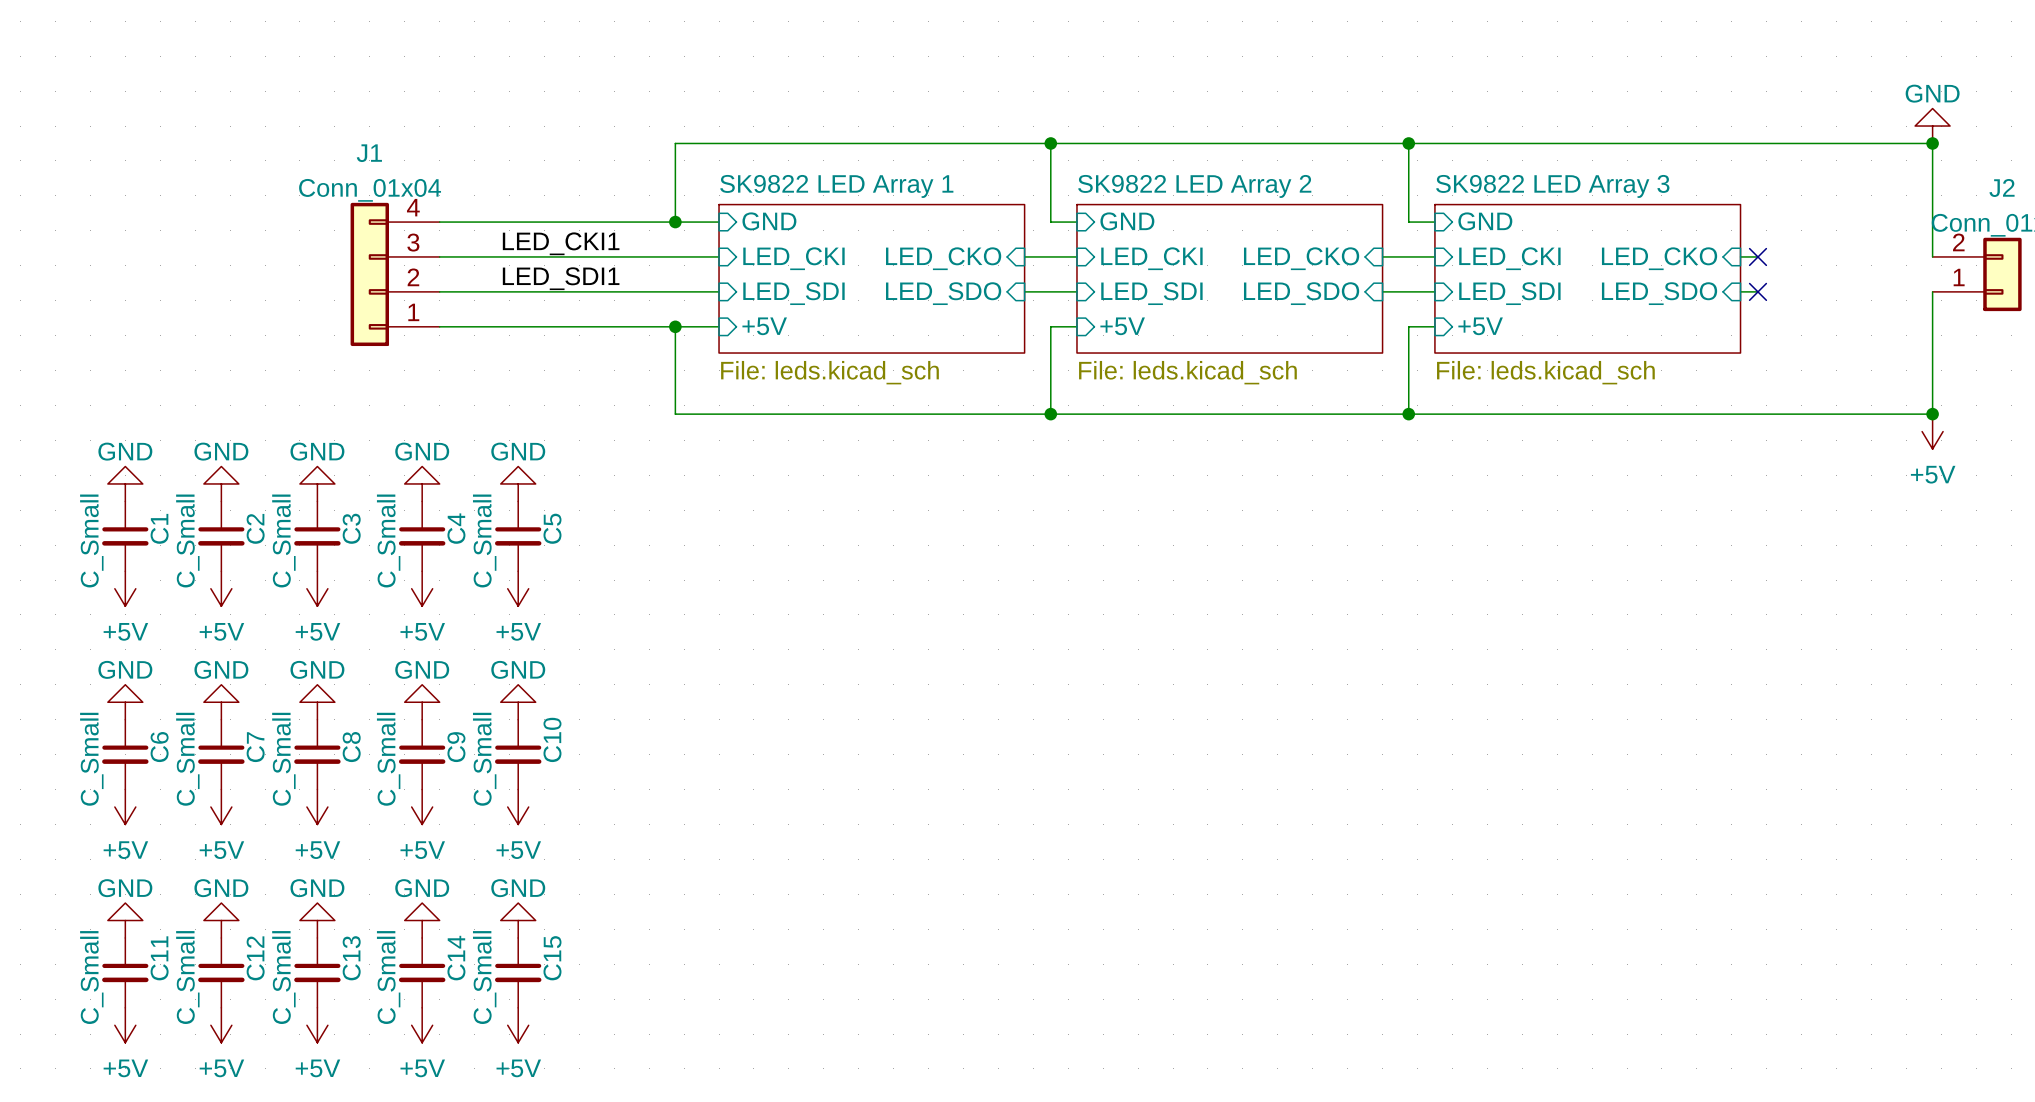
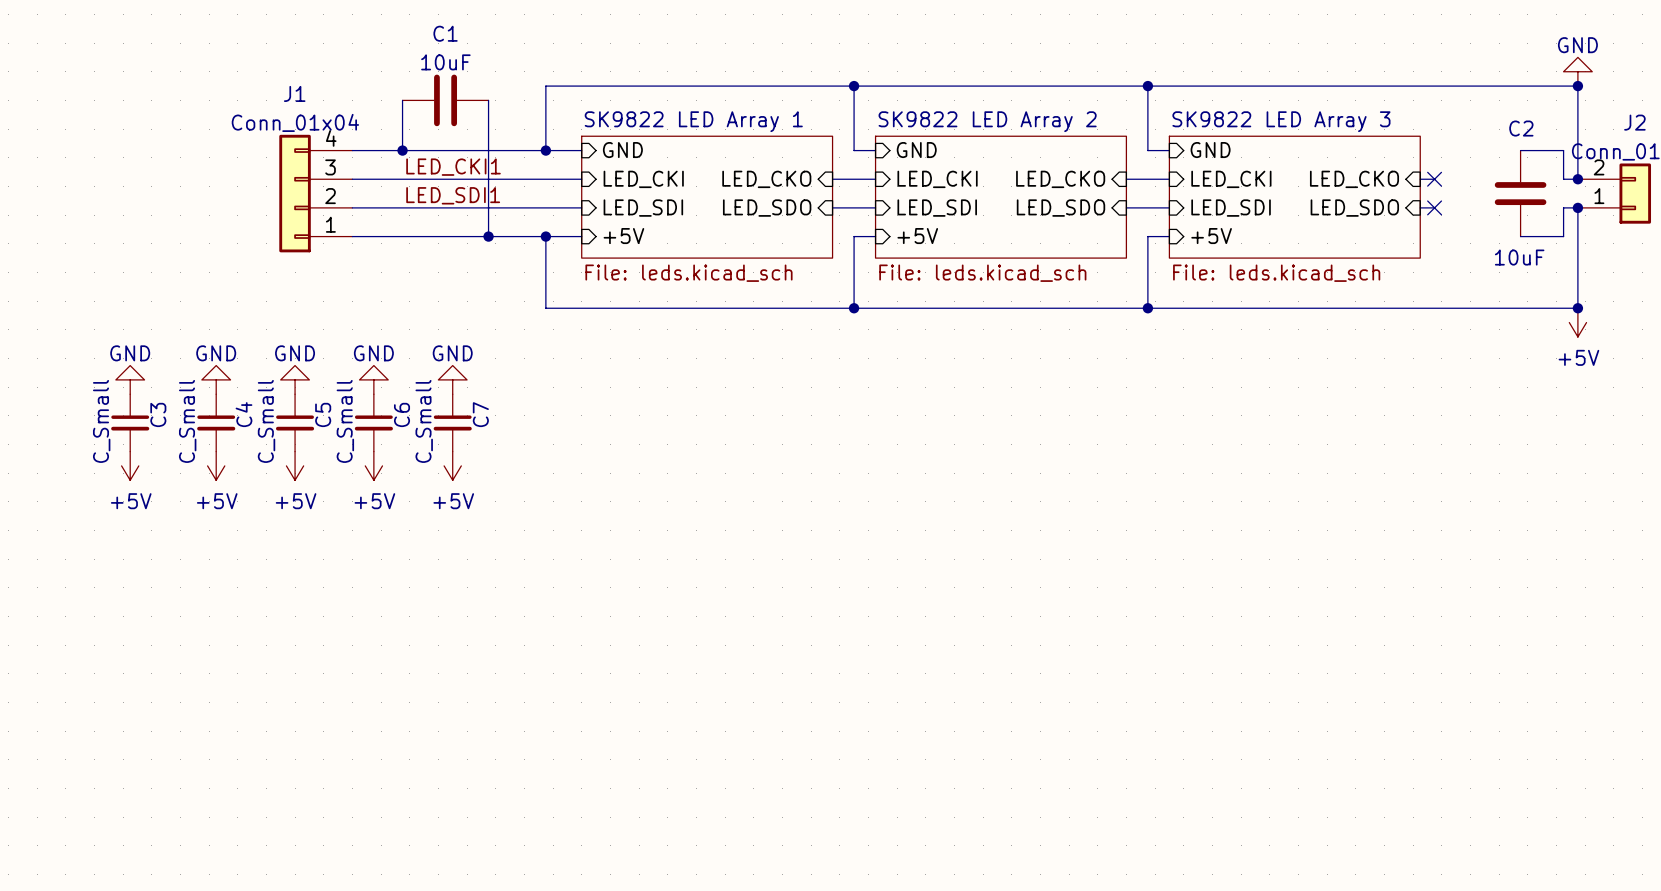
wire: none -> (402, 100) (402, 150)
wire: none -> (488, 100) (488, 236)
junction: none -> (402, 150)
wire: none -> (1520, 150) (1563, 150) (1563, 179) (1577, 179)
junction: none -> (1577, 179)
wire: none -> (1577, 207) (1563, 207) (1563, 236) (1520, 236)
junction: none -> (1577, 207)
junction: none -> (488, 236)
power symbol: GND (125, 483) -> none
power symbol: GND (221, 483) -> none
power symbol: GND (317, 483) -> none
power symbol: GND (422, 483) -> none
power symbol: GND (518, 483) -> none
C1 symbol: [102, 501, 149, 572] -> [402, 74, 489, 127]
power symbol: none -> GND (130, 379)
C2 symbol: [198, 501, 245, 572] -> [1494, 150, 1547, 237]
power symbol: none -> GND (216, 379)
power symbol: none -> GND (295, 379)
power symbol: none -> GND (373, 379)
power symbol: none -> GND (452, 379)
C1 name position: C1 (159, 528) -> C1 (445, 33)
C2 name position: C2 (255, 528) -> C2 (1521, 128)
C3 position: (317, 536) -> (130, 422)
C4 position: (422, 536) -> (216, 422)
C5 position: (518, 536) -> (295, 422)
C1 value: C_Small (91, 540) -> 10uF (445, 62)
C2 value: C_Small (187, 540) -> 10uF (1519, 257)
power symbol: +5V (125, 588) -> none
power symbol: +5V (221, 588) -> none
power symbol: +5V (317, 588) -> none
power symbol: +5V (422, 588) -> none
power symbol: +5V (518, 588) -> none
power symbol: none -> +5V (130, 465)
power symbol: none -> +5V (216, 465)
power symbol: none -> +5V (295, 465)
power symbol: none -> +5V (373, 465)
power symbol: none -> +5V (452, 465)
power symbol: GND (125, 702) -> none
power symbol: GND (221, 702) -> none
power symbol: GND (317, 702) -> none
power symbol: GND (422, 702) -> none
power symbol: GND (518, 702) -> none
C6 position: (125, 754) -> (373, 422)
C7 position: (221, 754) -> (452, 422)
C8: C_Small (317, 754) -> none
C9: C_Small (422, 754) -> none
C10: C_Small (518, 754) -> none
power symbol: +5V (125, 807) -> none
power symbol: +5V (221, 807) -> none
power symbol: +5V (317, 807) -> none
power symbol: +5V (422, 807) -> none
power symbol: +5V (518, 807) -> none
power symbol: GND (125, 920) -> none
power symbol: GND (221, 920) -> none
power symbol: GND (317, 920) -> none
power symbol: GND (422, 920) -> none
power symbol: GND (518, 920) -> none
C11: C_Small (125, 972) -> none
C12: C_Small (221, 972) -> none
C13: C_Small (317, 972) -> none
C14: C_Small (422, 972) -> none
C15: C_Small (518, 972) -> none
power symbol: +5V (125, 1025) -> none
power symbol: +5V (221, 1025) -> none
power symbol: +5V (317, 1025) -> none
power symbol: +5V (422, 1025) -> none
power symbol: +5V (518, 1025) -> none

